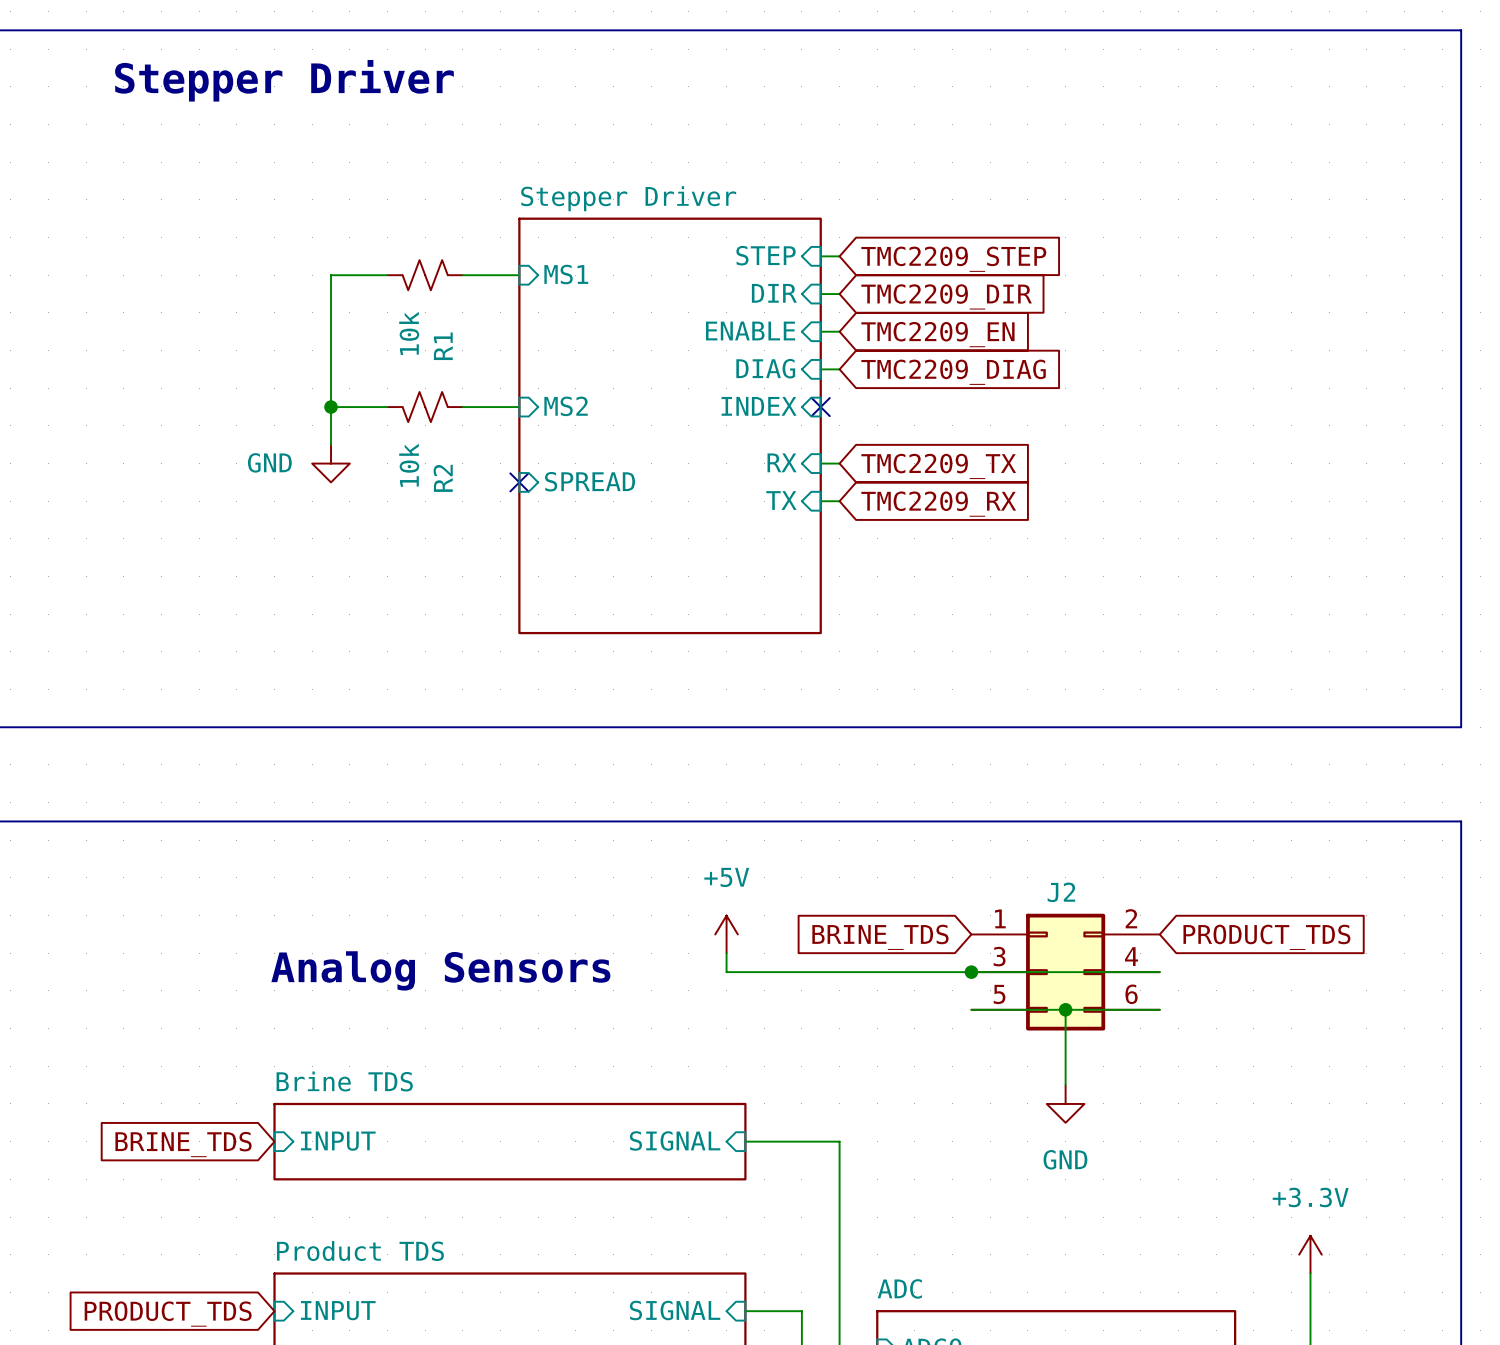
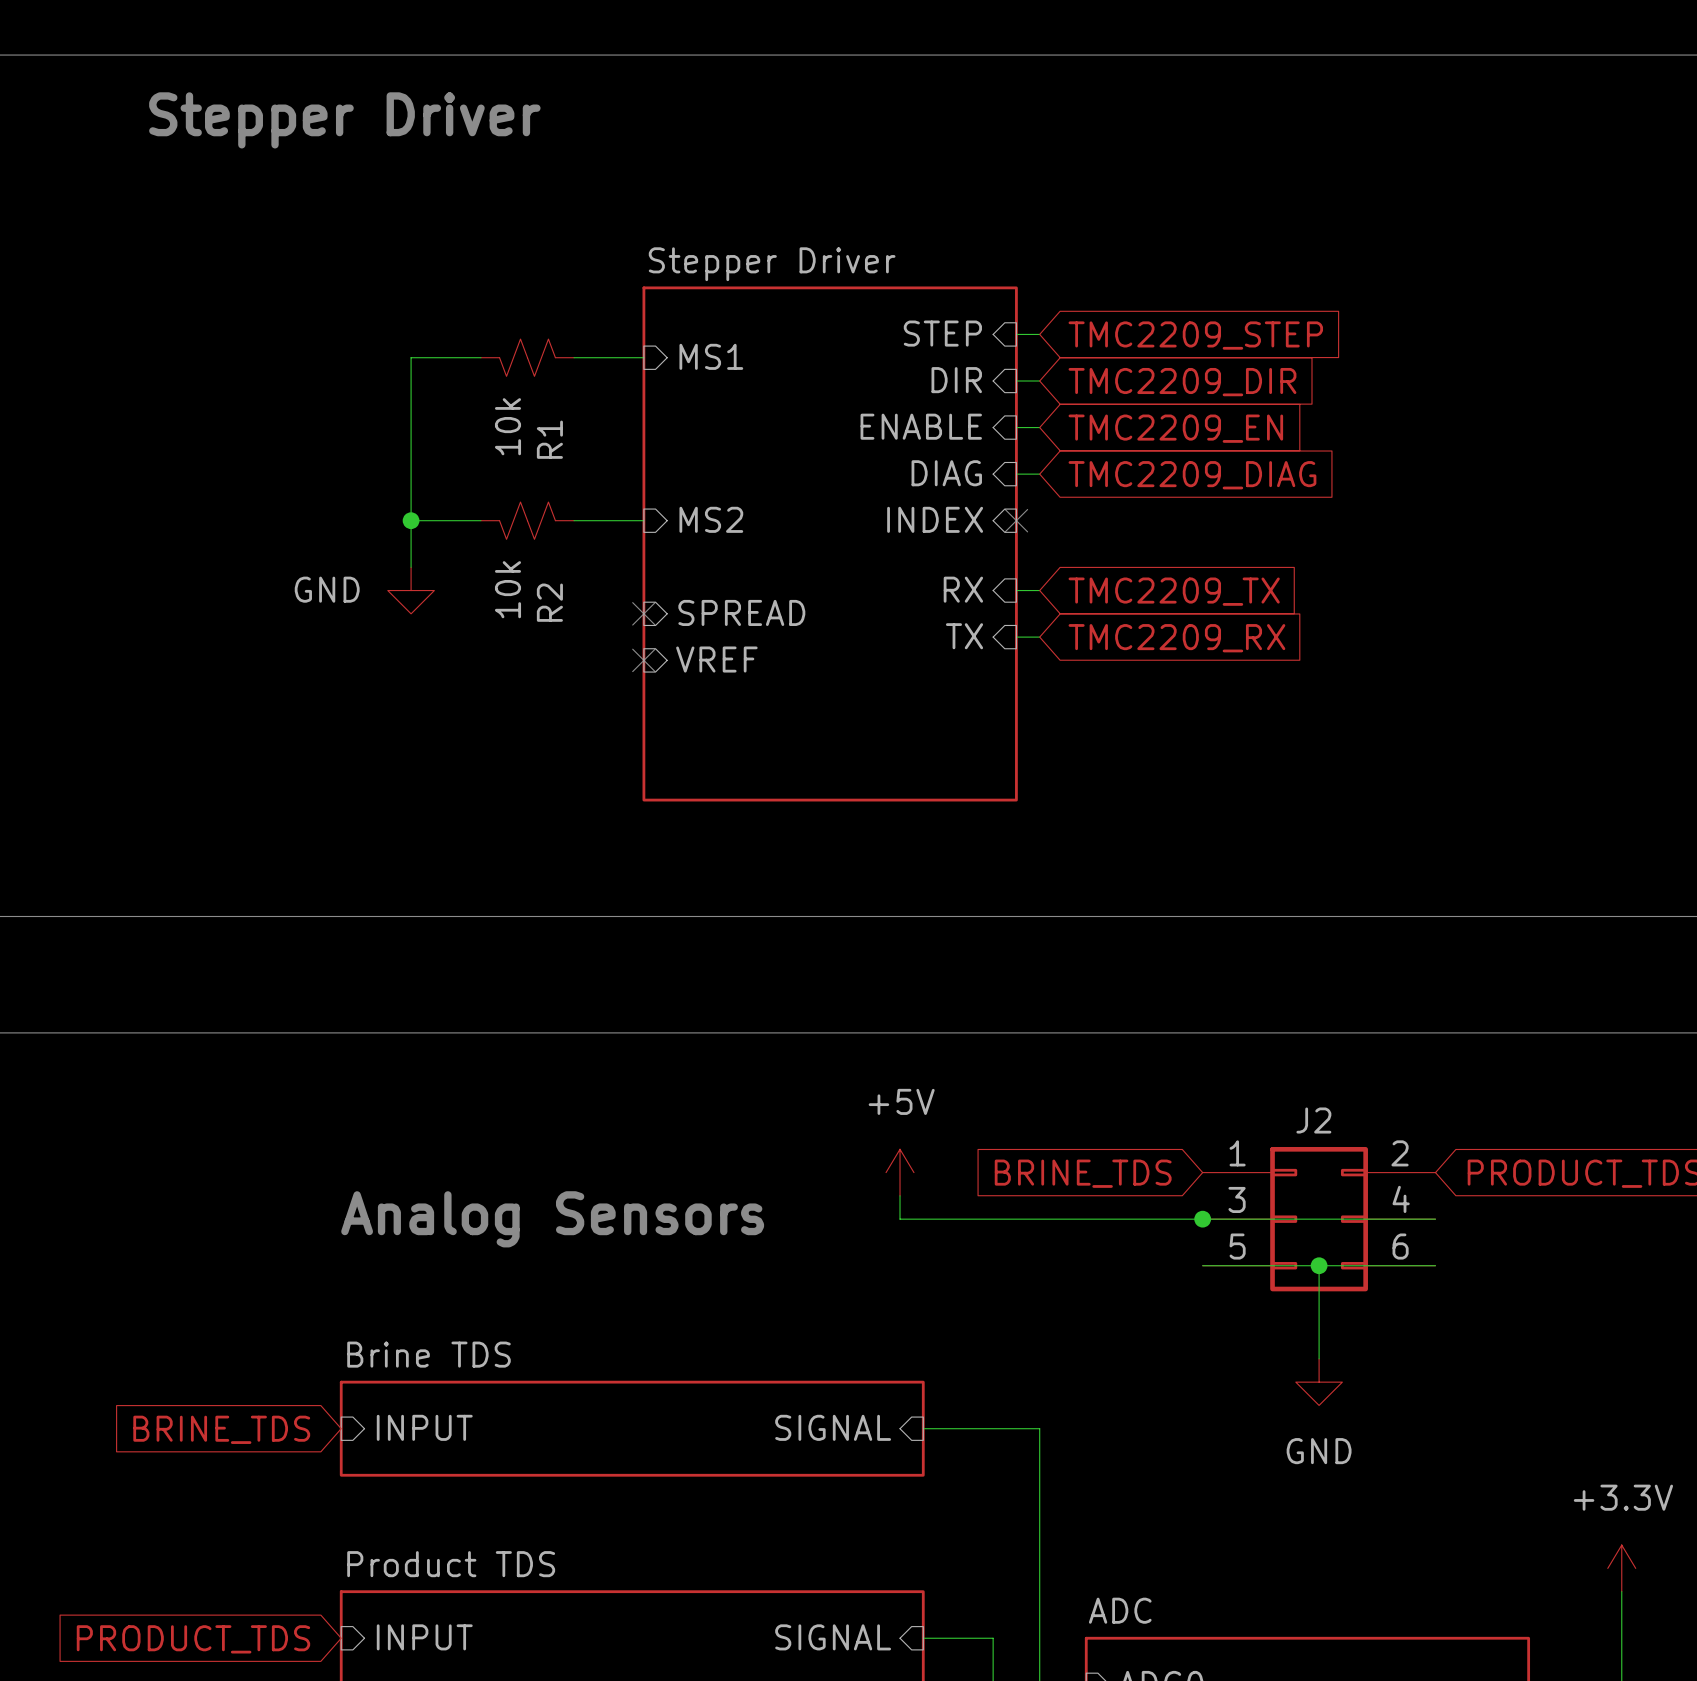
sheet pin: none -> VREF (716, 659)
no-connect mark: none -> (643, 660)

